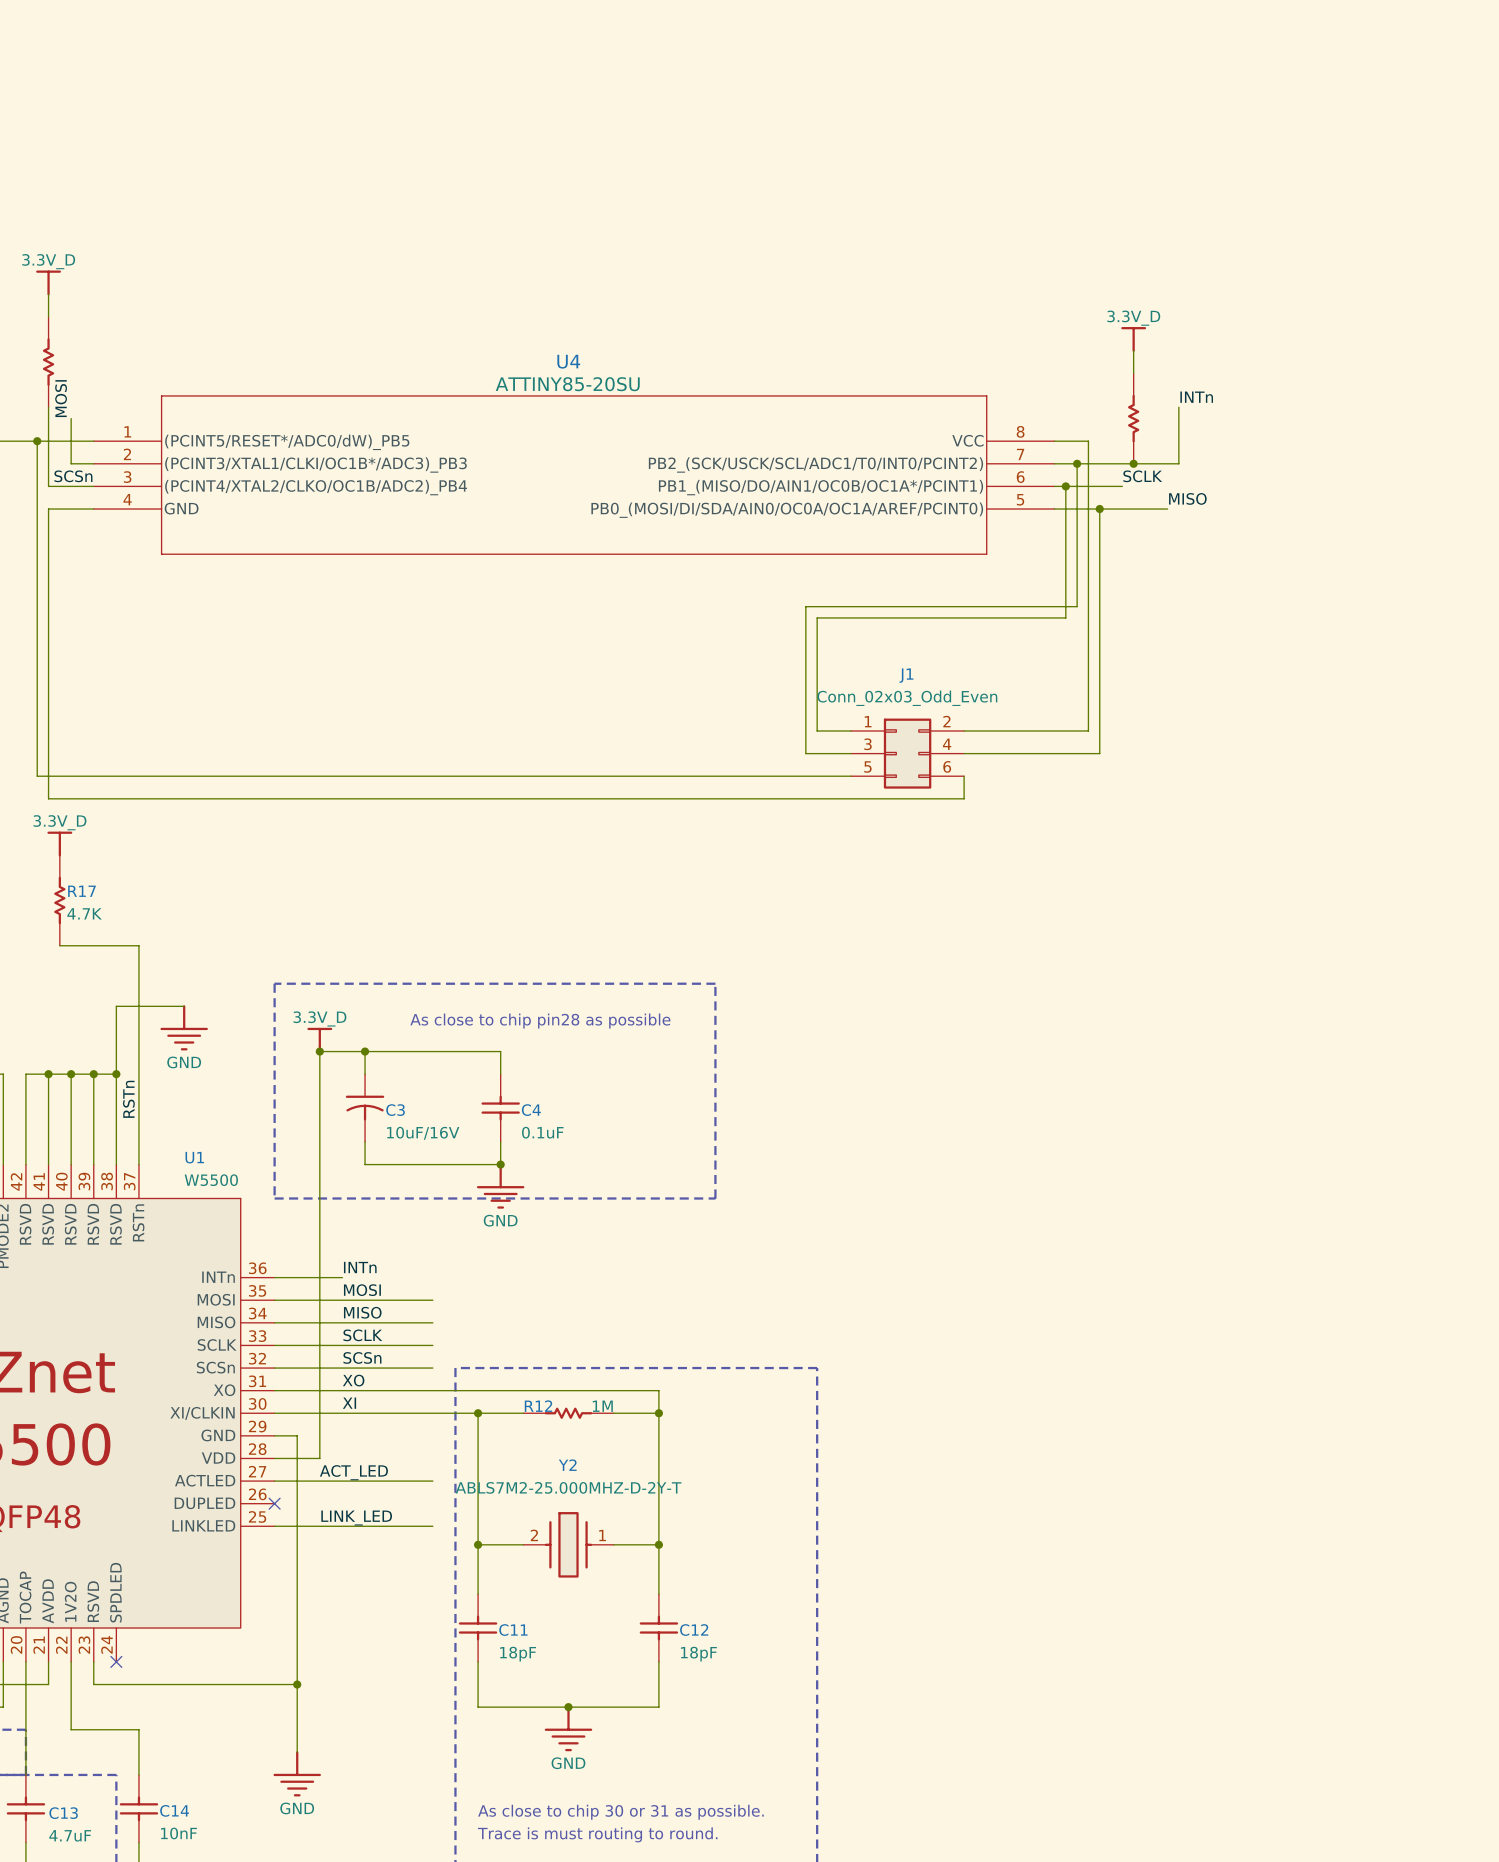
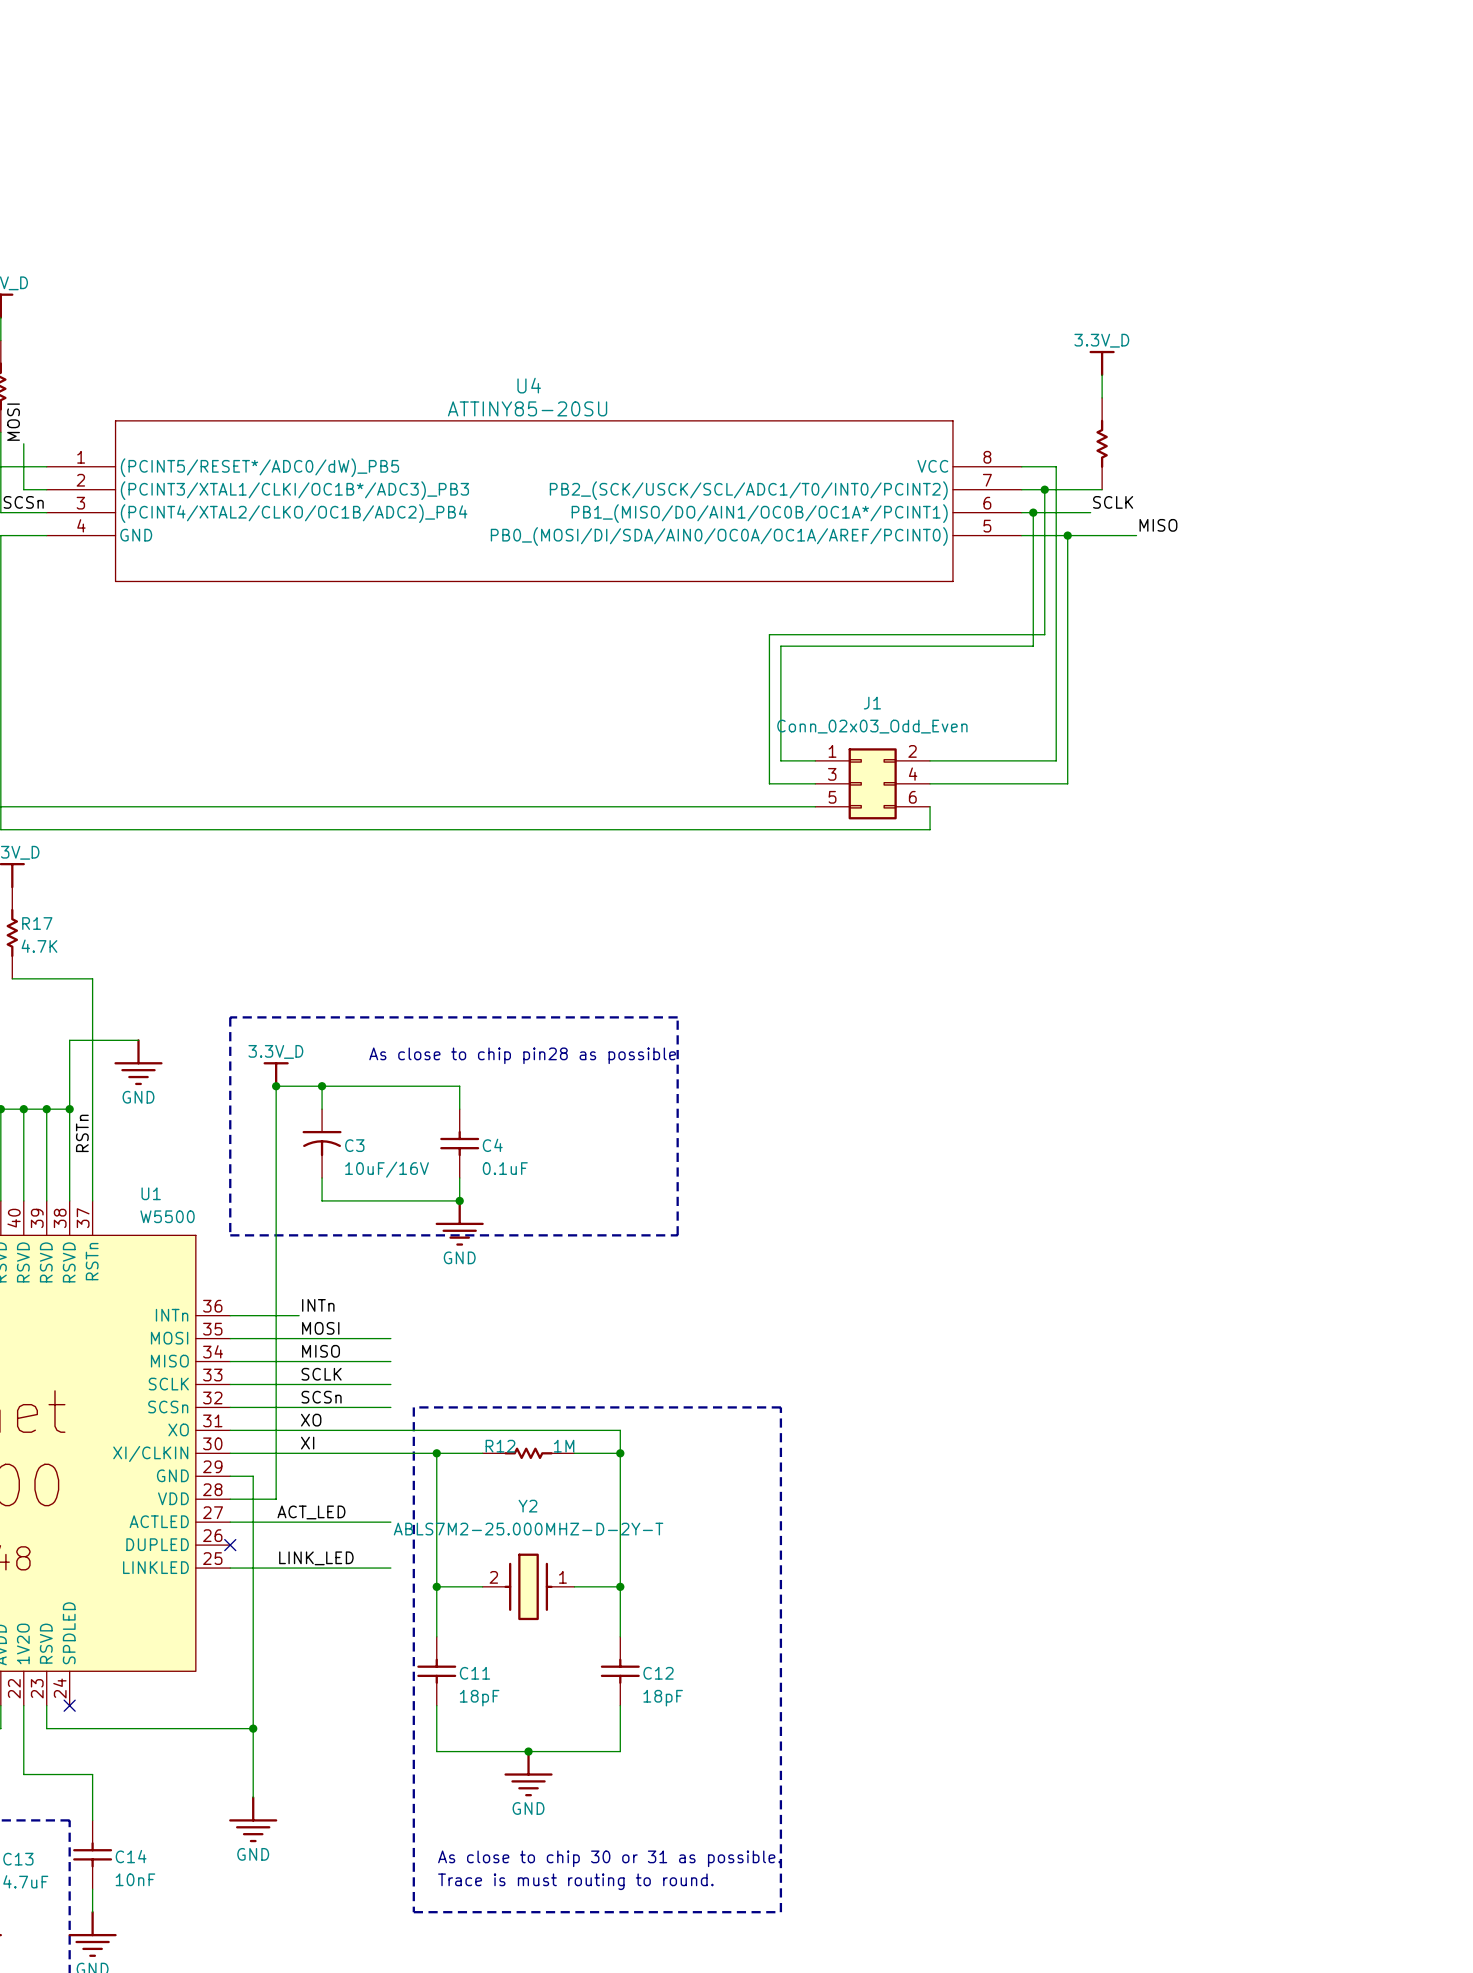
label: INTn (1196, 397) -> none
wire: (1178, 407) (1178, 463) (1133, 463) -> none
junction: (1133, 463) -> none

